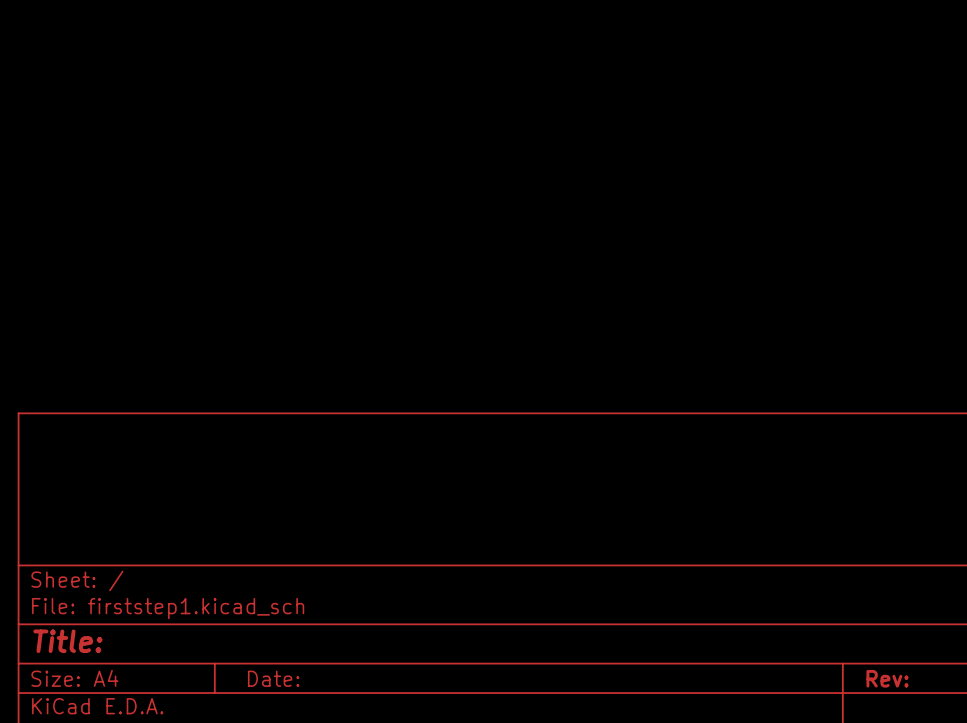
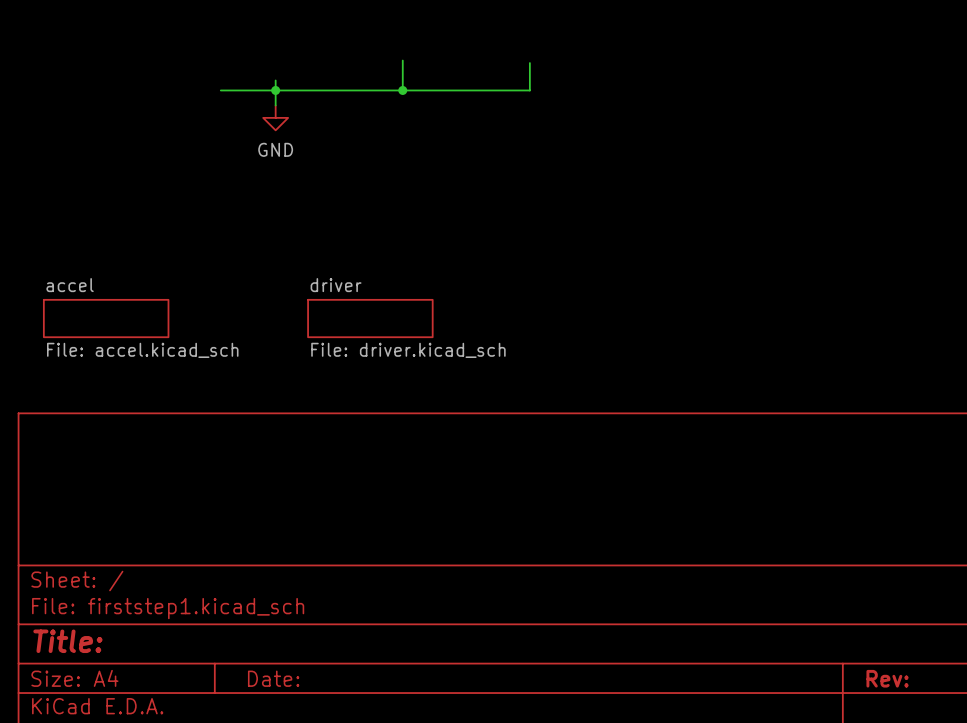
wire: none -> (402, 60) (402, 90)
wire: none -> (529, 63) (529, 90) (220, 90)
wire: none -> (275, 80) (275, 105)
junction: none -> (275, 90)
junction: none -> (402, 90)
power symbol: none -> GND (275, 117)
sheet accel: none -> File: accel.kicad_sch (106, 318)
sheet driver: none -> File: driver.kicad_sch (370, 318)

